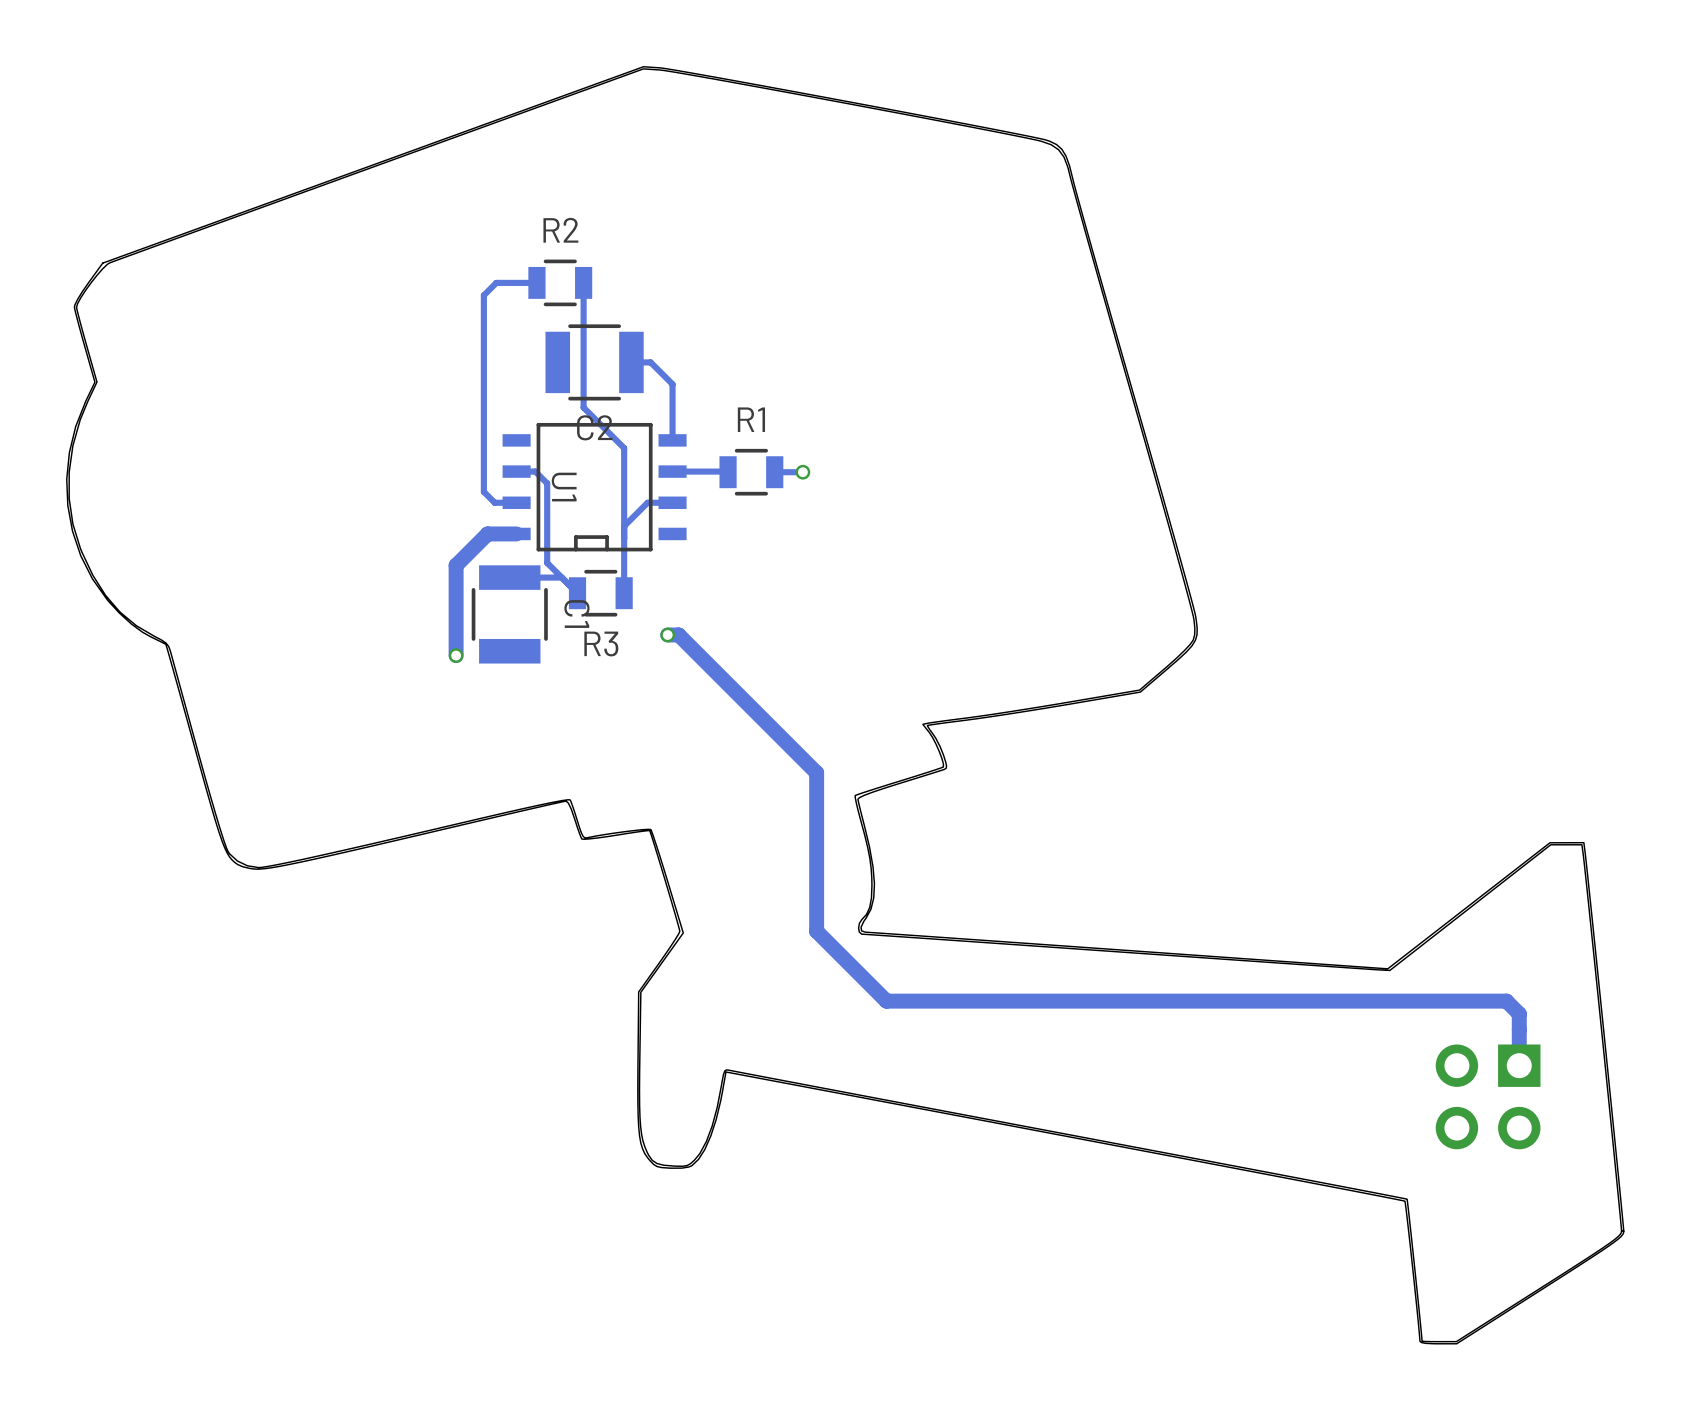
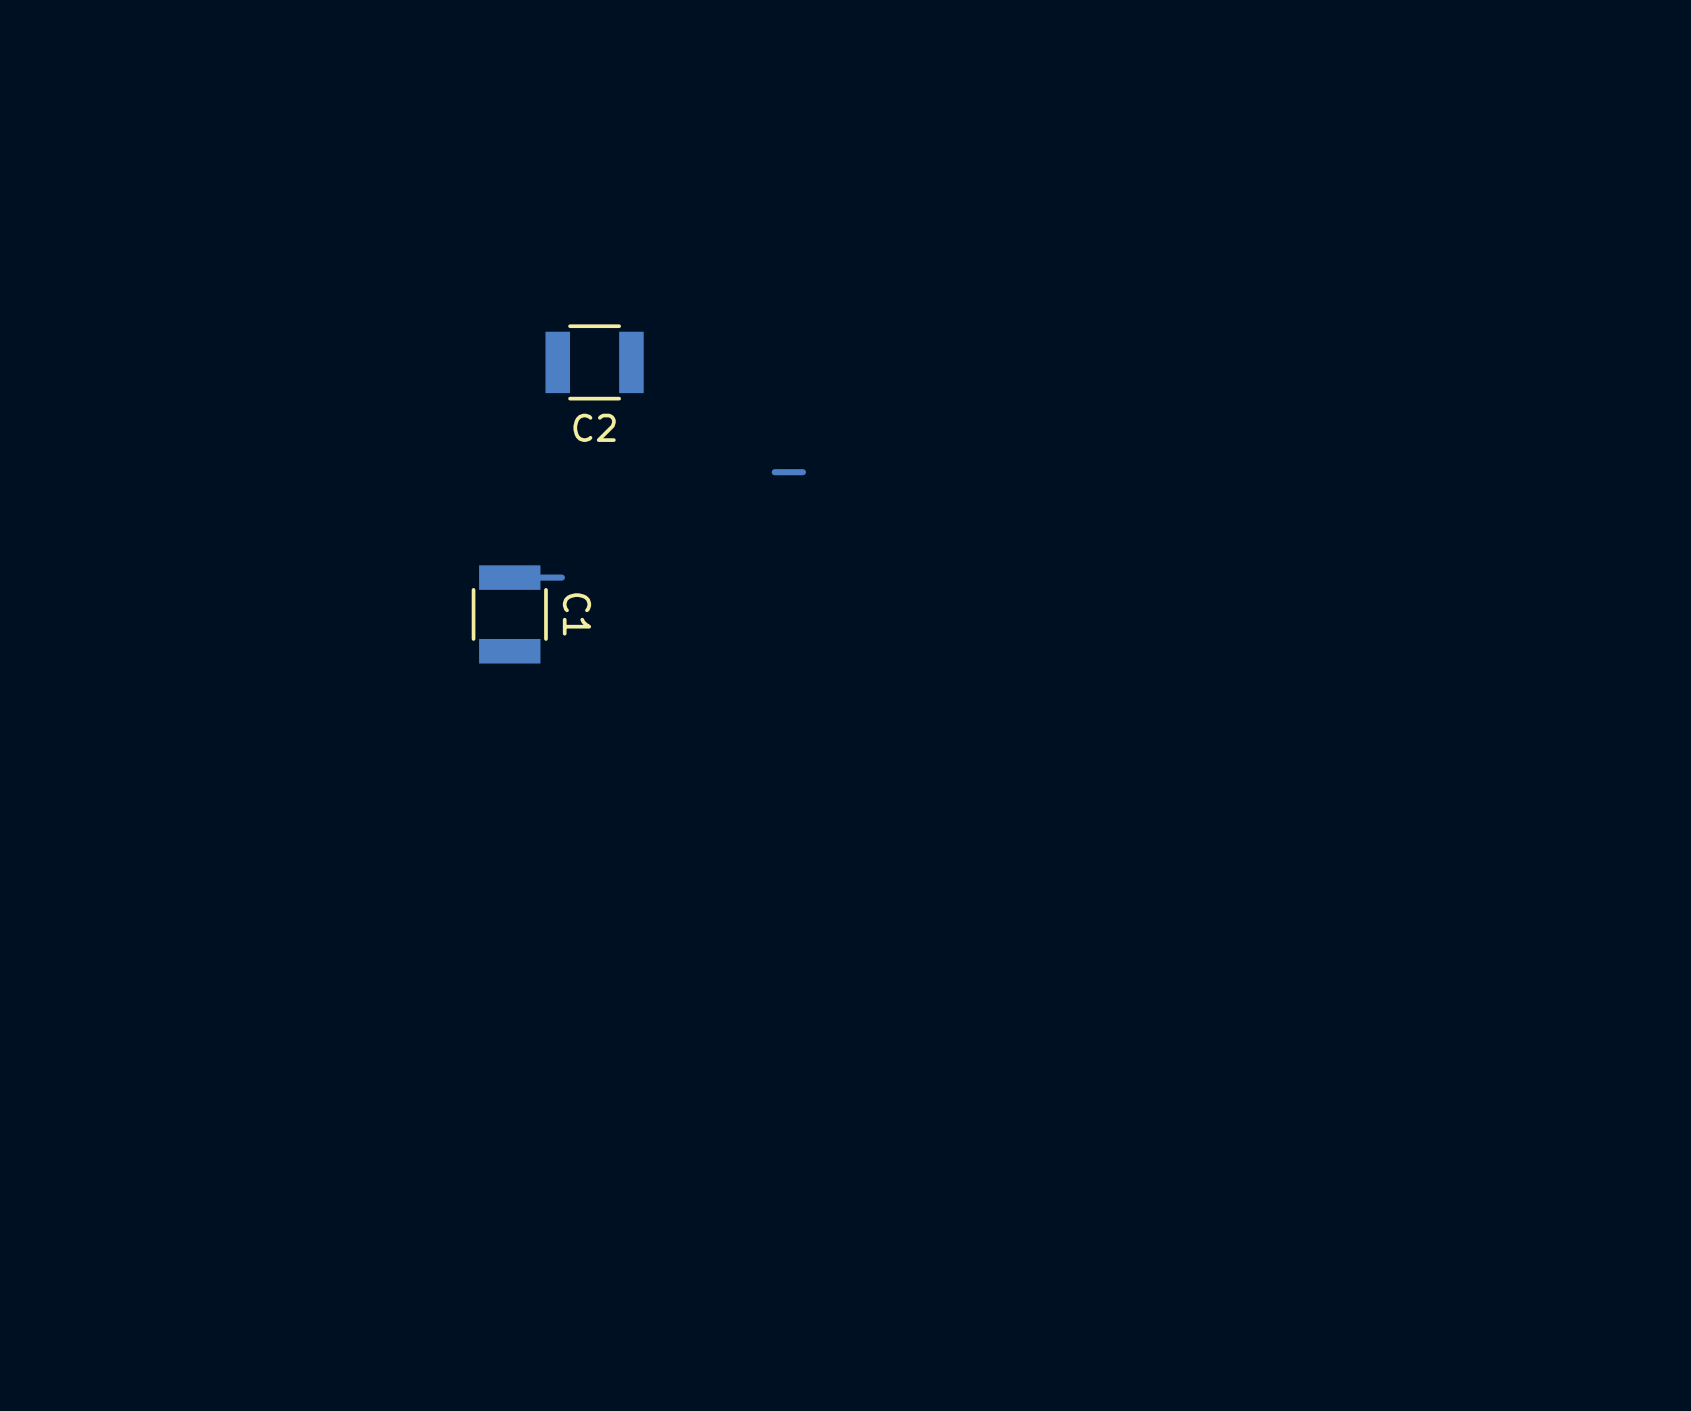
drawing: [66, 66, 1624, 1344] -> none
track: (536, 282) (496, 282) (483, 295) (483, 491) (494, 502) (516, 502) -> none
R2: (560, 282) -> none
track: (583, 282) (583, 407) (624, 448) (624, 593) -> none
track: (631, 362) (650, 362) (672, 384) (672, 440) -> none
track: (516, 471) (535, 471) (547, 483) (547, 562) (577, 593) -> none
track: (672, 471) (728, 472) -> none
R1: (751, 472) -> none
via: (802, 472) -> none
U1: (594, 487) -> none
track: (672, 502) (647, 502) (624, 526) -> none
track: (516, 533) (487, 533) (456, 565) (456, 655) -> none
R3: (600, 593) -> none
track: (667, 634) (678, 634) (816, 772) (816, 931) (886, 1001) (1506, 1001) (1519, 1013) (1519, 1065) -> none
via: (667, 634) -> none
via: (456, 655) -> none
part: (1488, 1096) -> none

